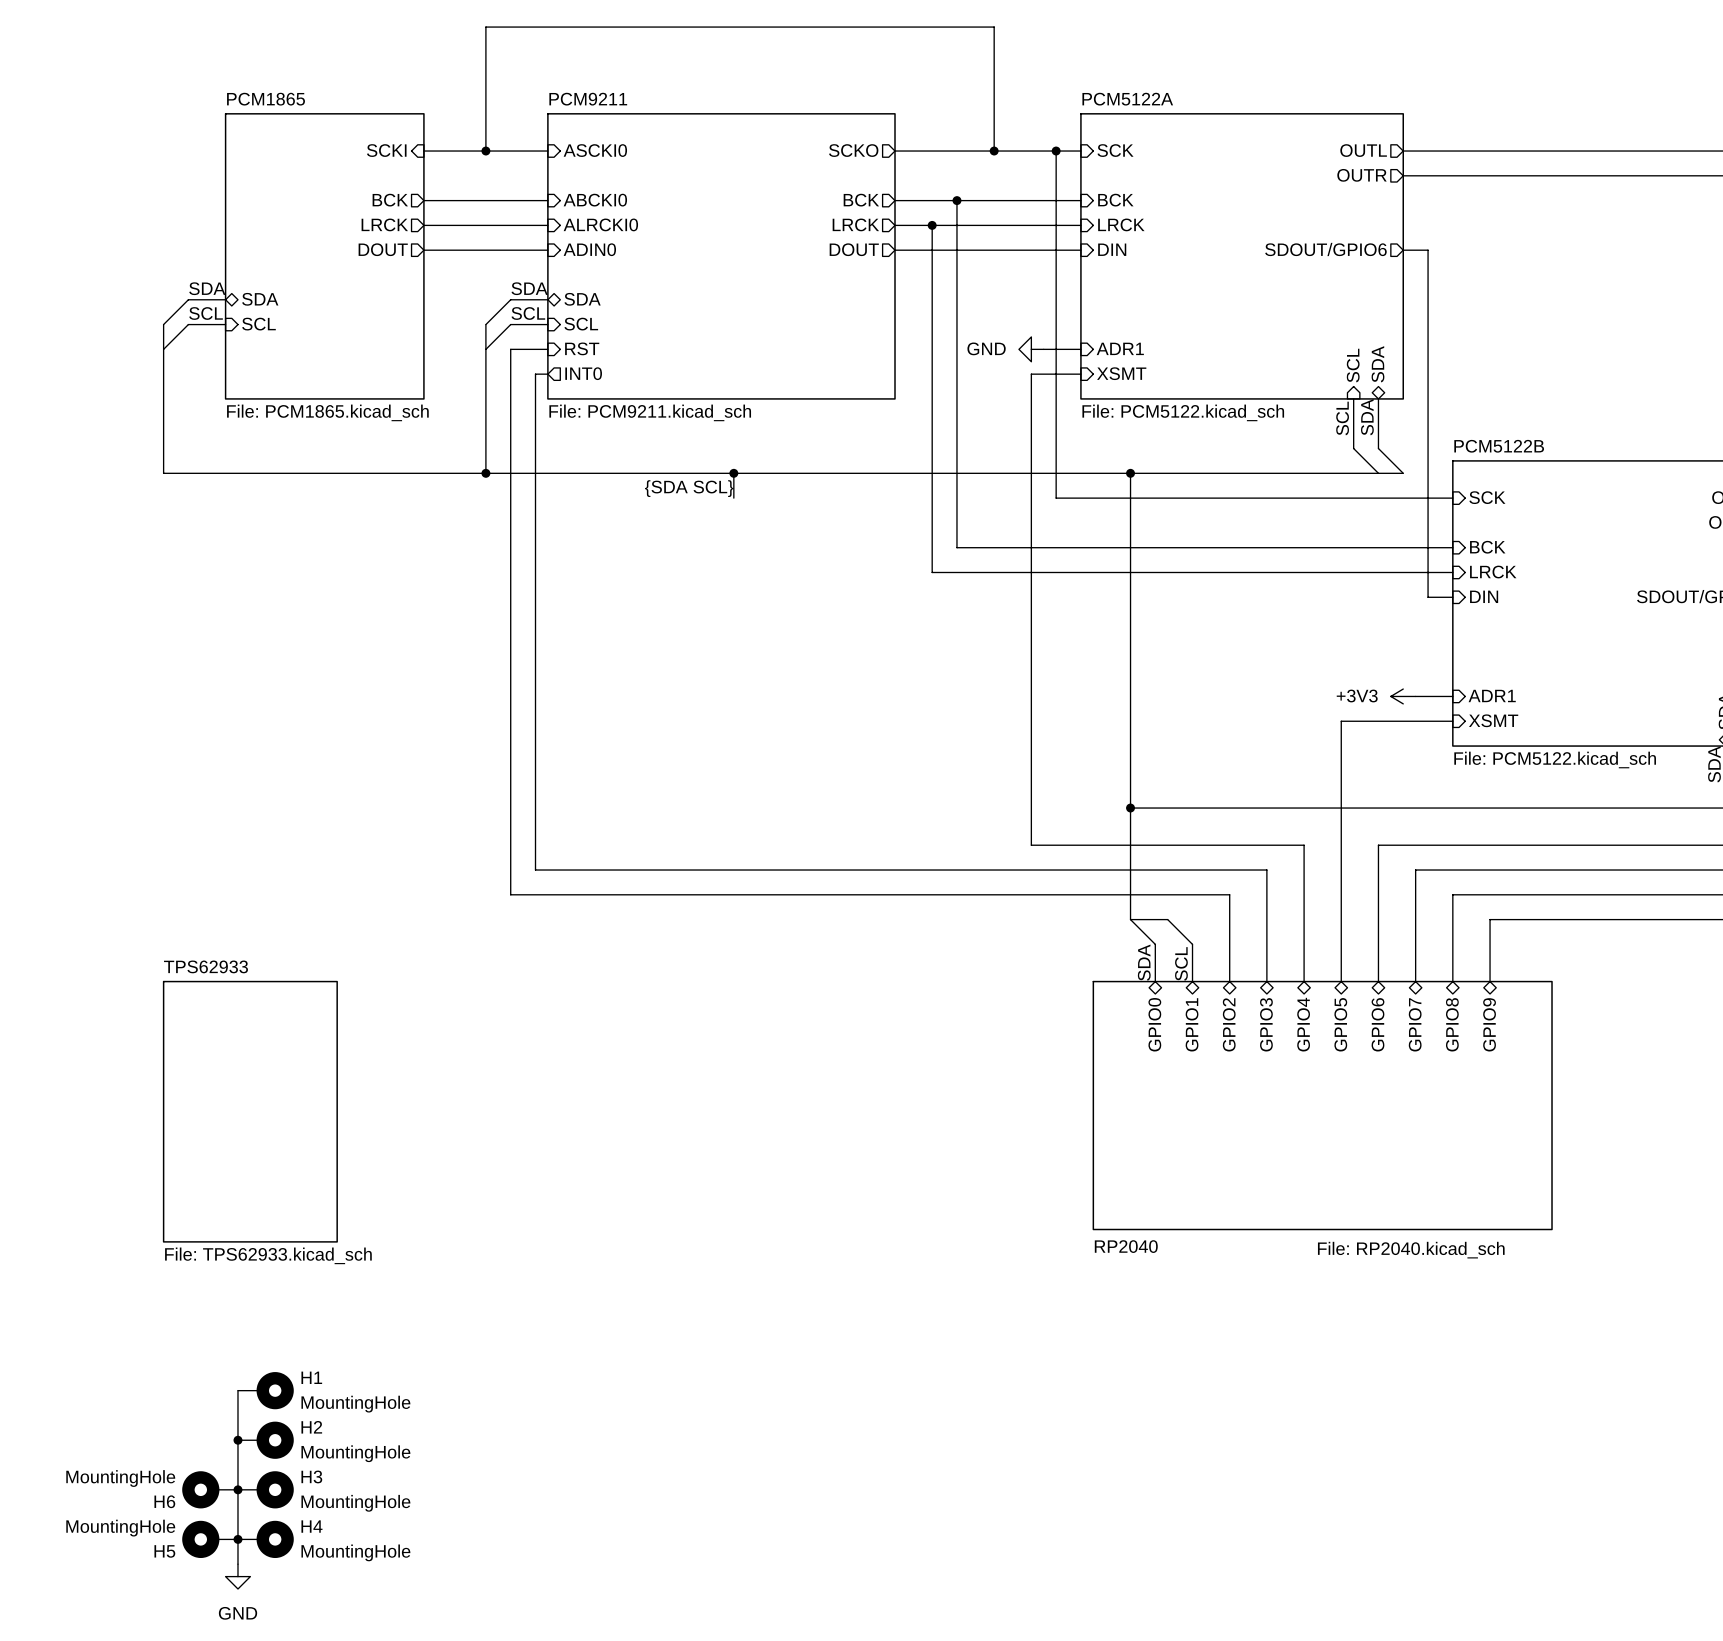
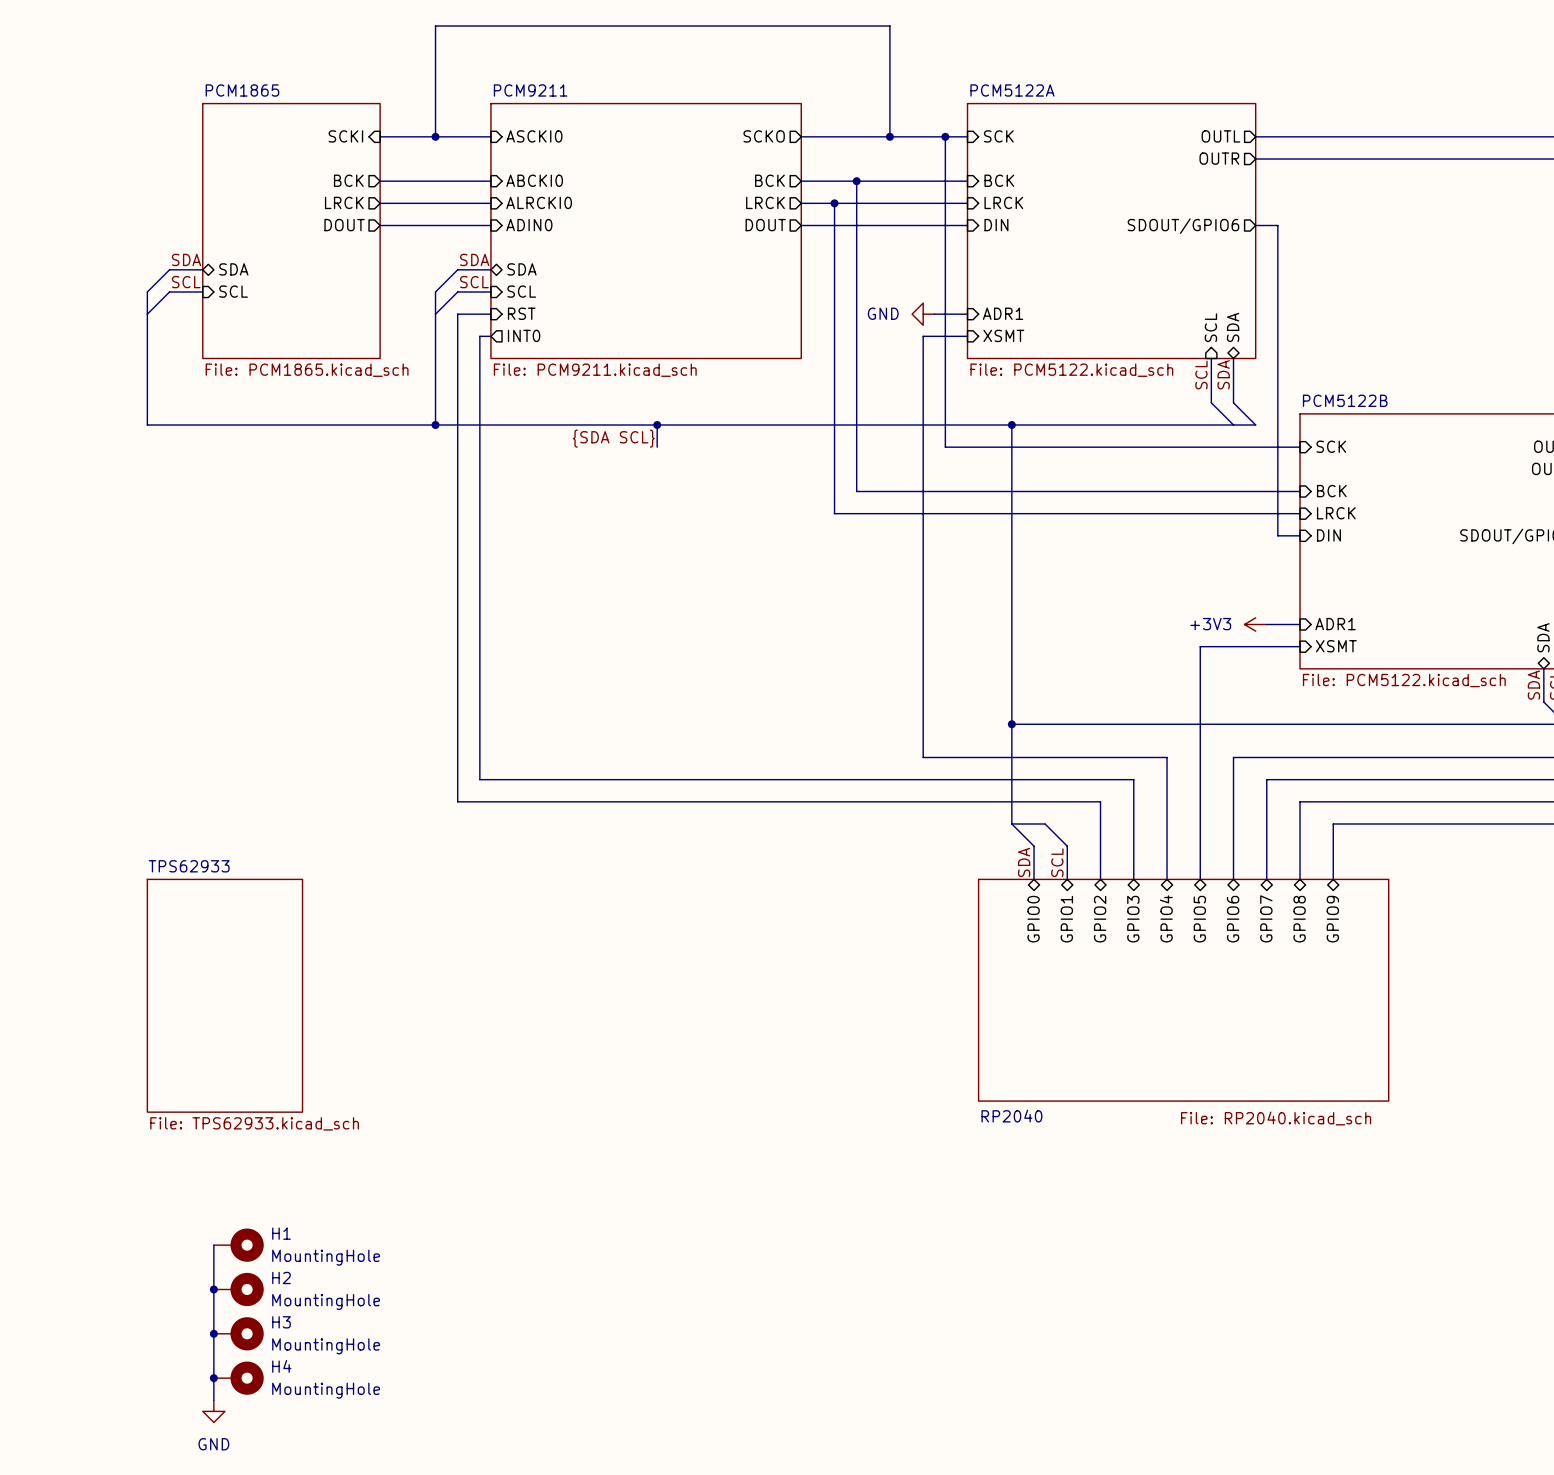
H6: MountingHole (210, 1489) -> none
H5: MountingHole (210, 1539) -> none

